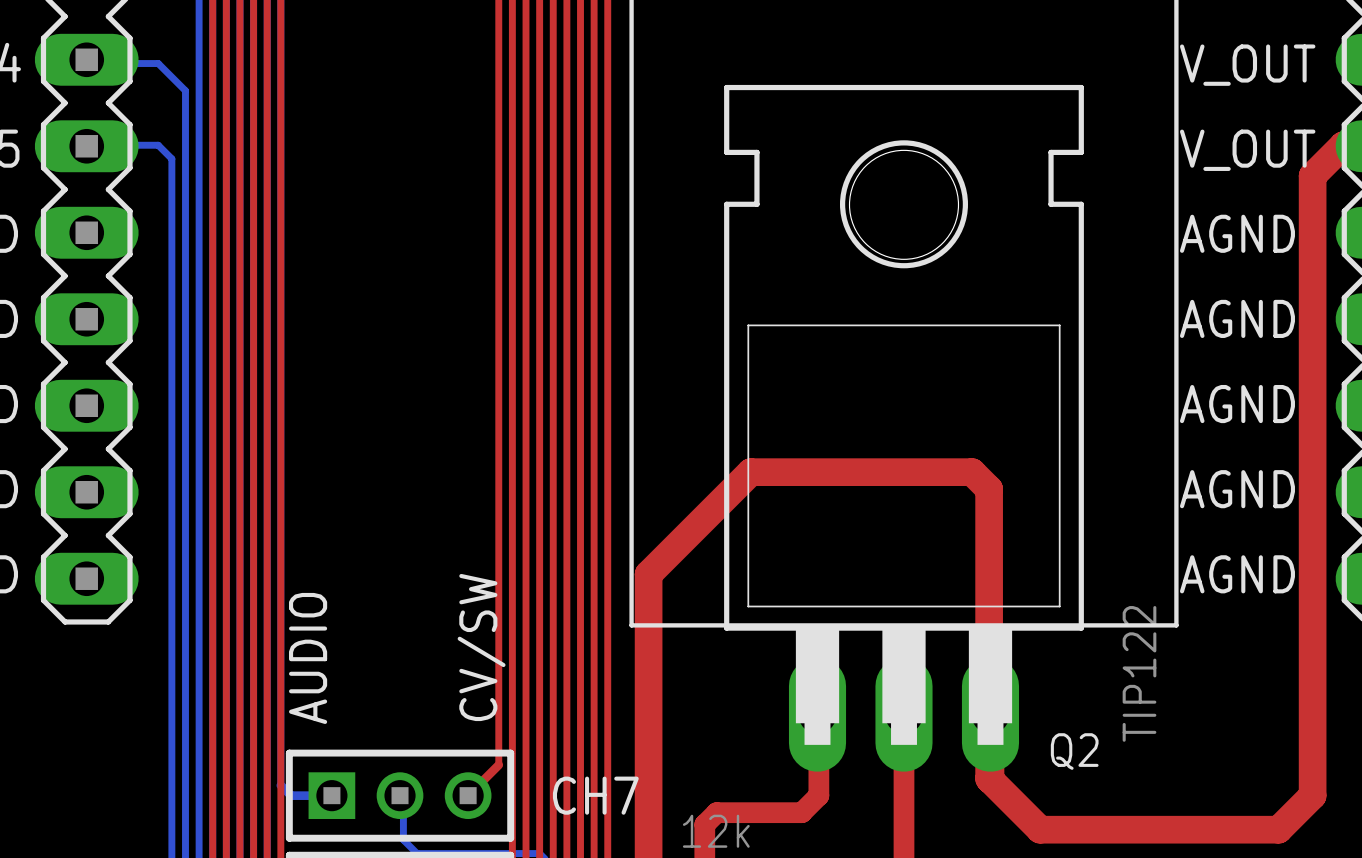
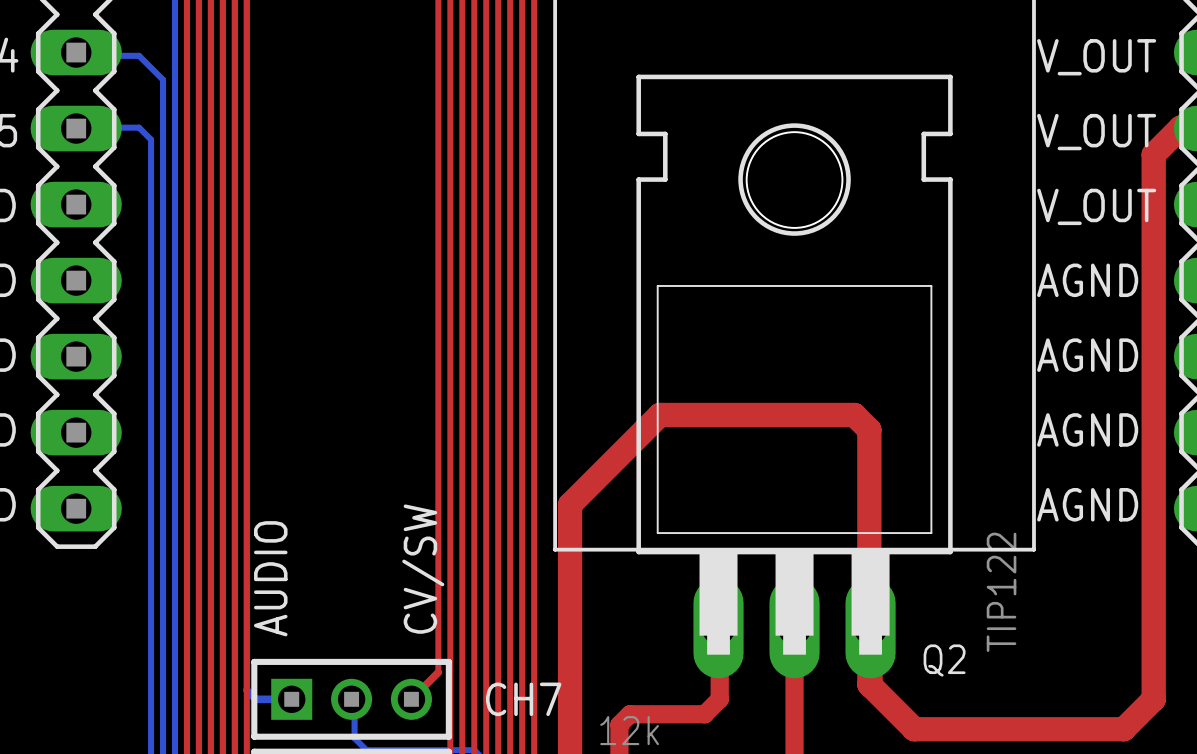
text: AGND (1237, 233) -> V_OUT (1096, 206)

